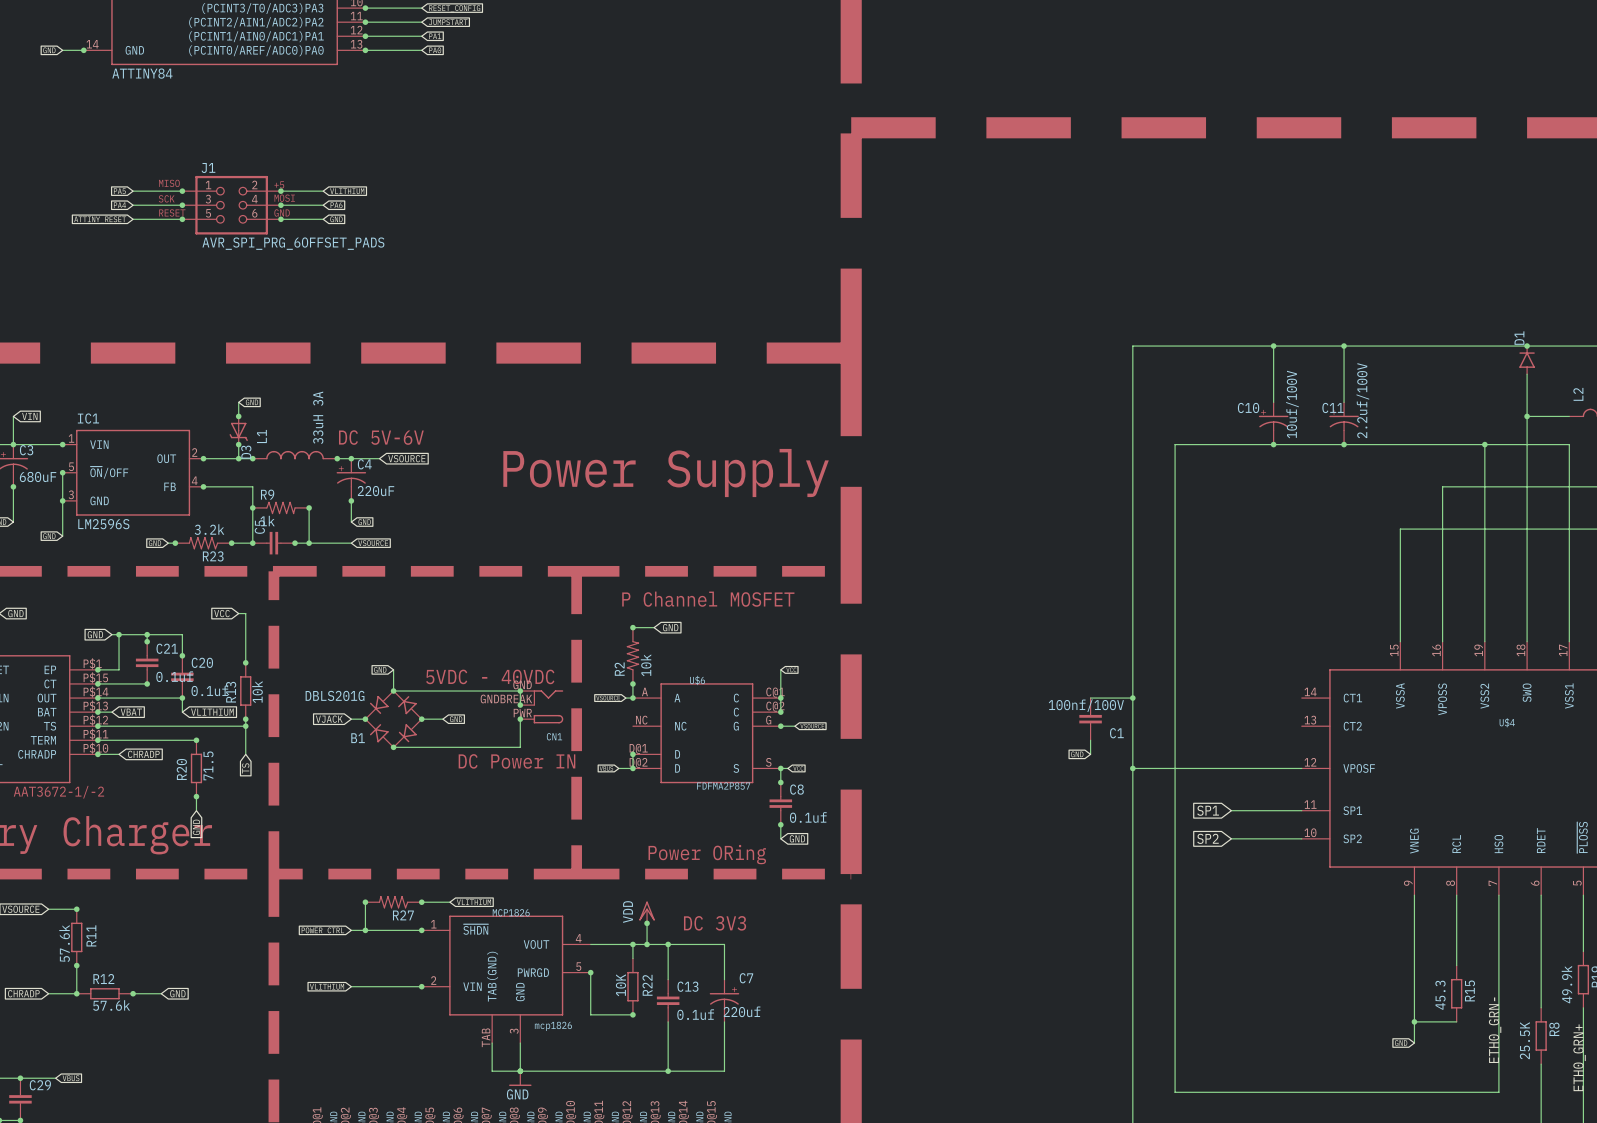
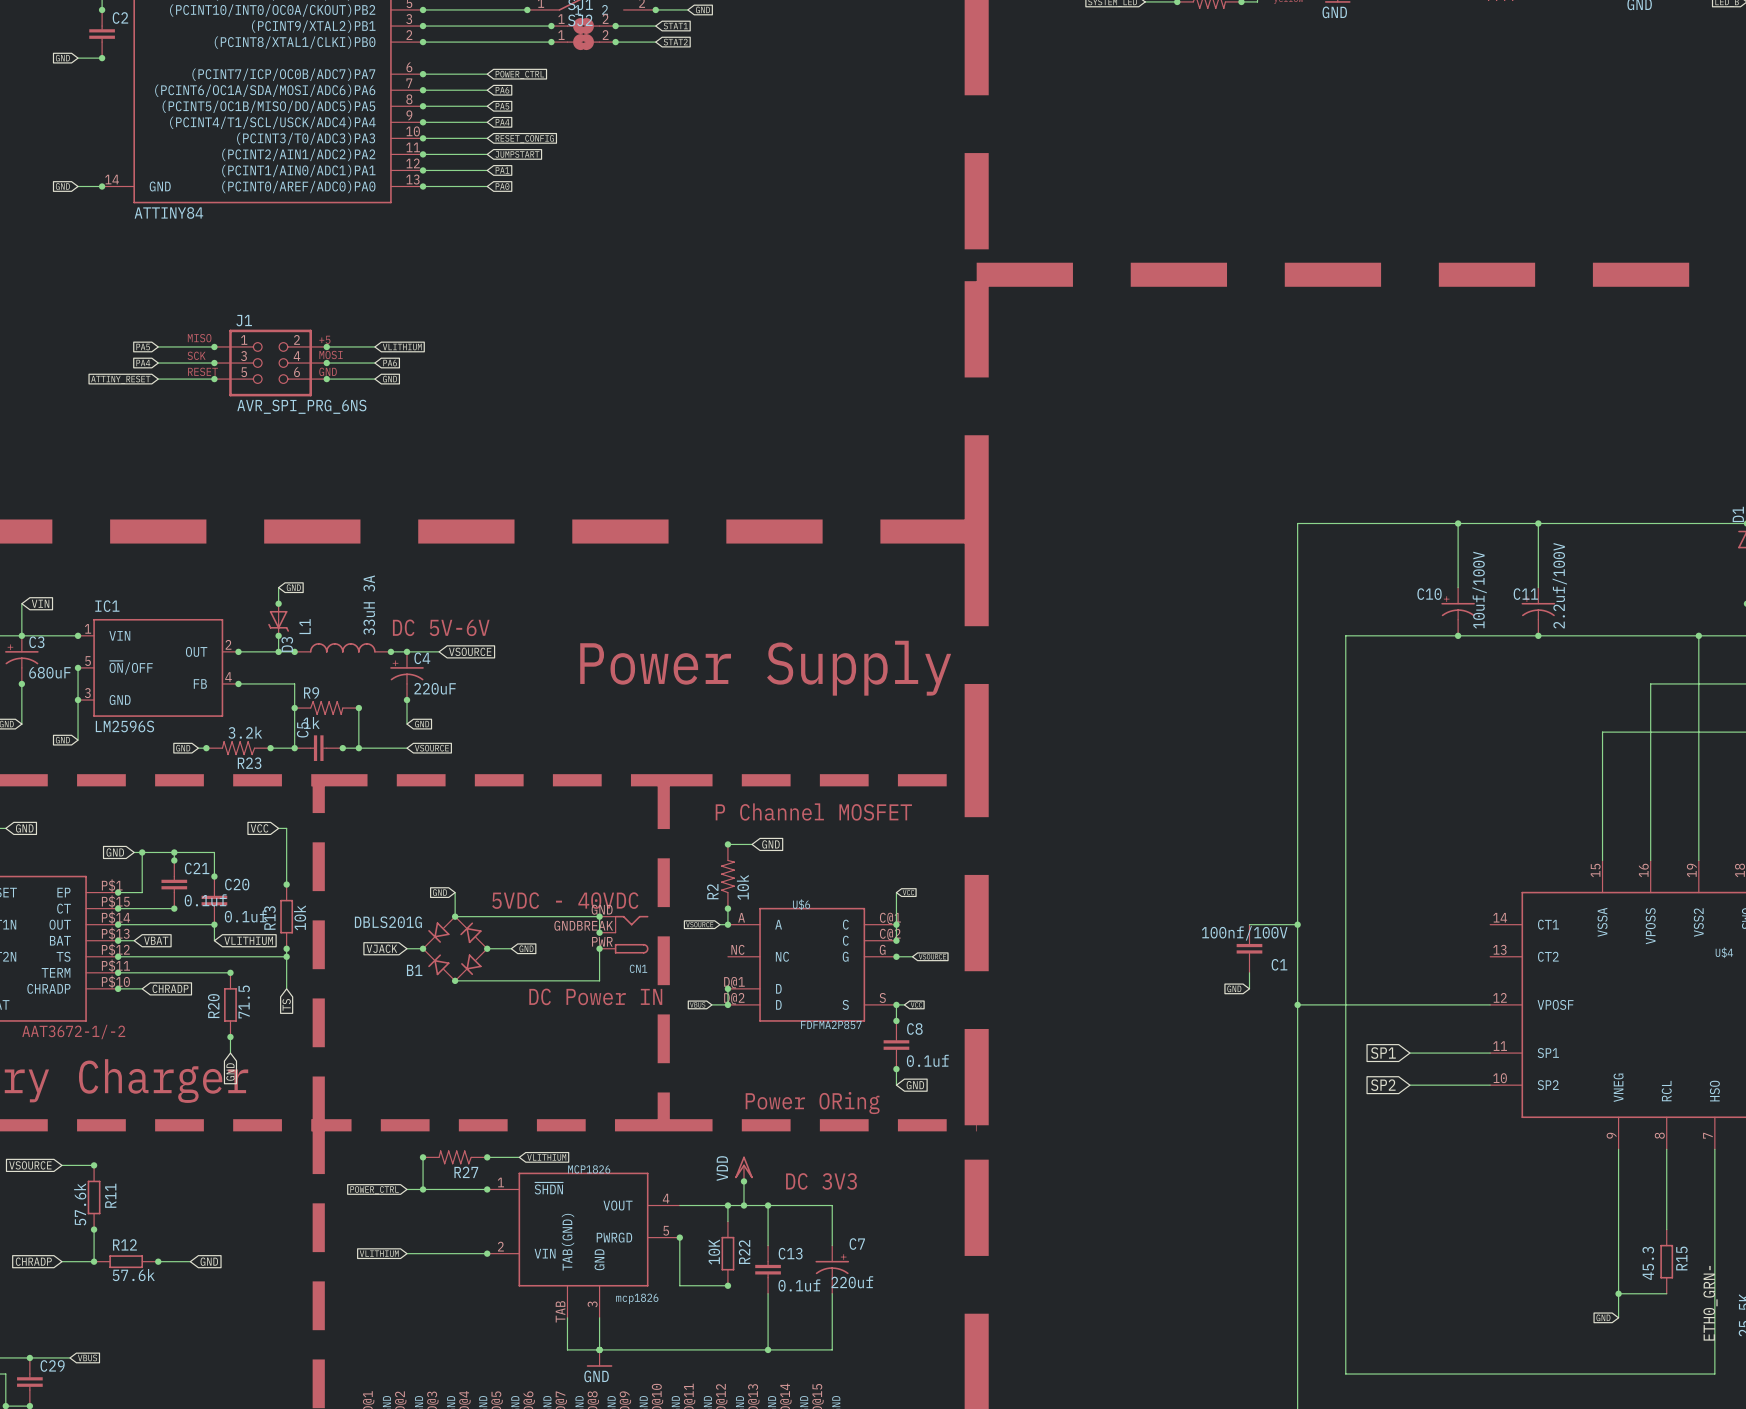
J1 value: AVR_SPI_PRG_6OFFSET_PADS (293, 243) -> AVR_SPI_PRG_6NS (301, 406)

